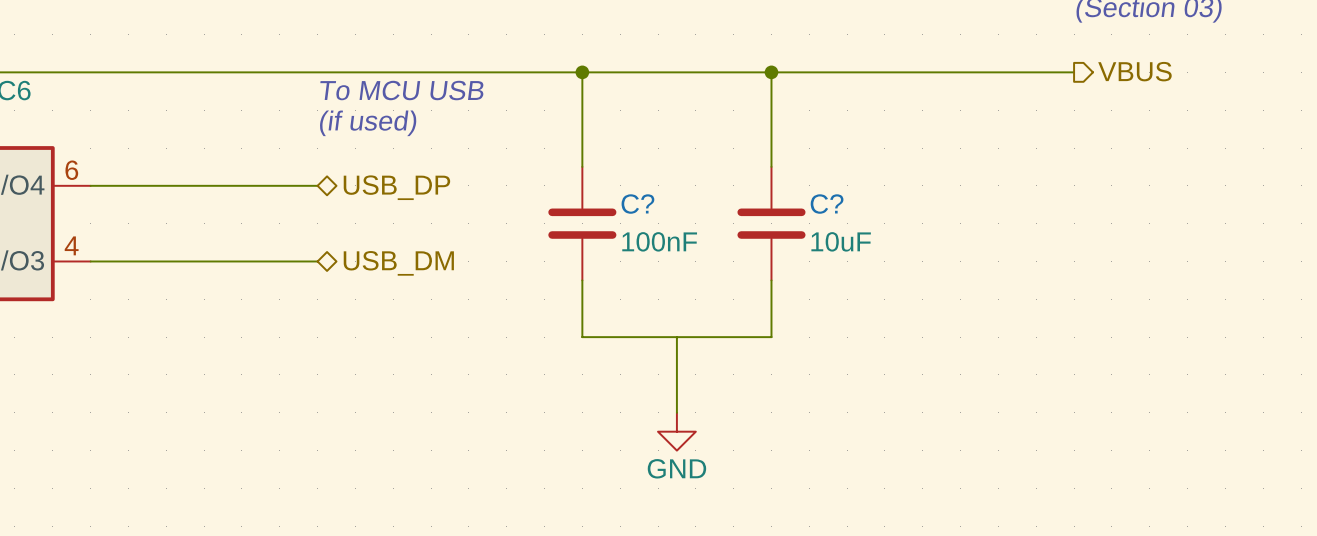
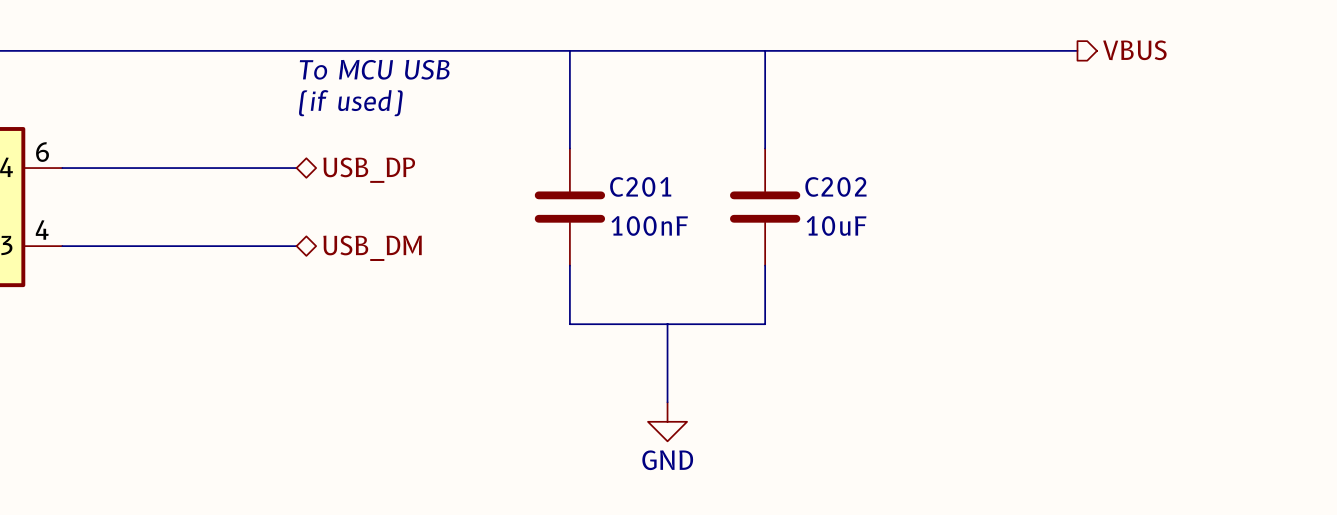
junction: (582, 72) -> none
junction: (771, 72) -> none
C? name: C? (637, 204) -> C201 (640, 186)
C? name: C? (827, 204) -> C202 (835, 186)

